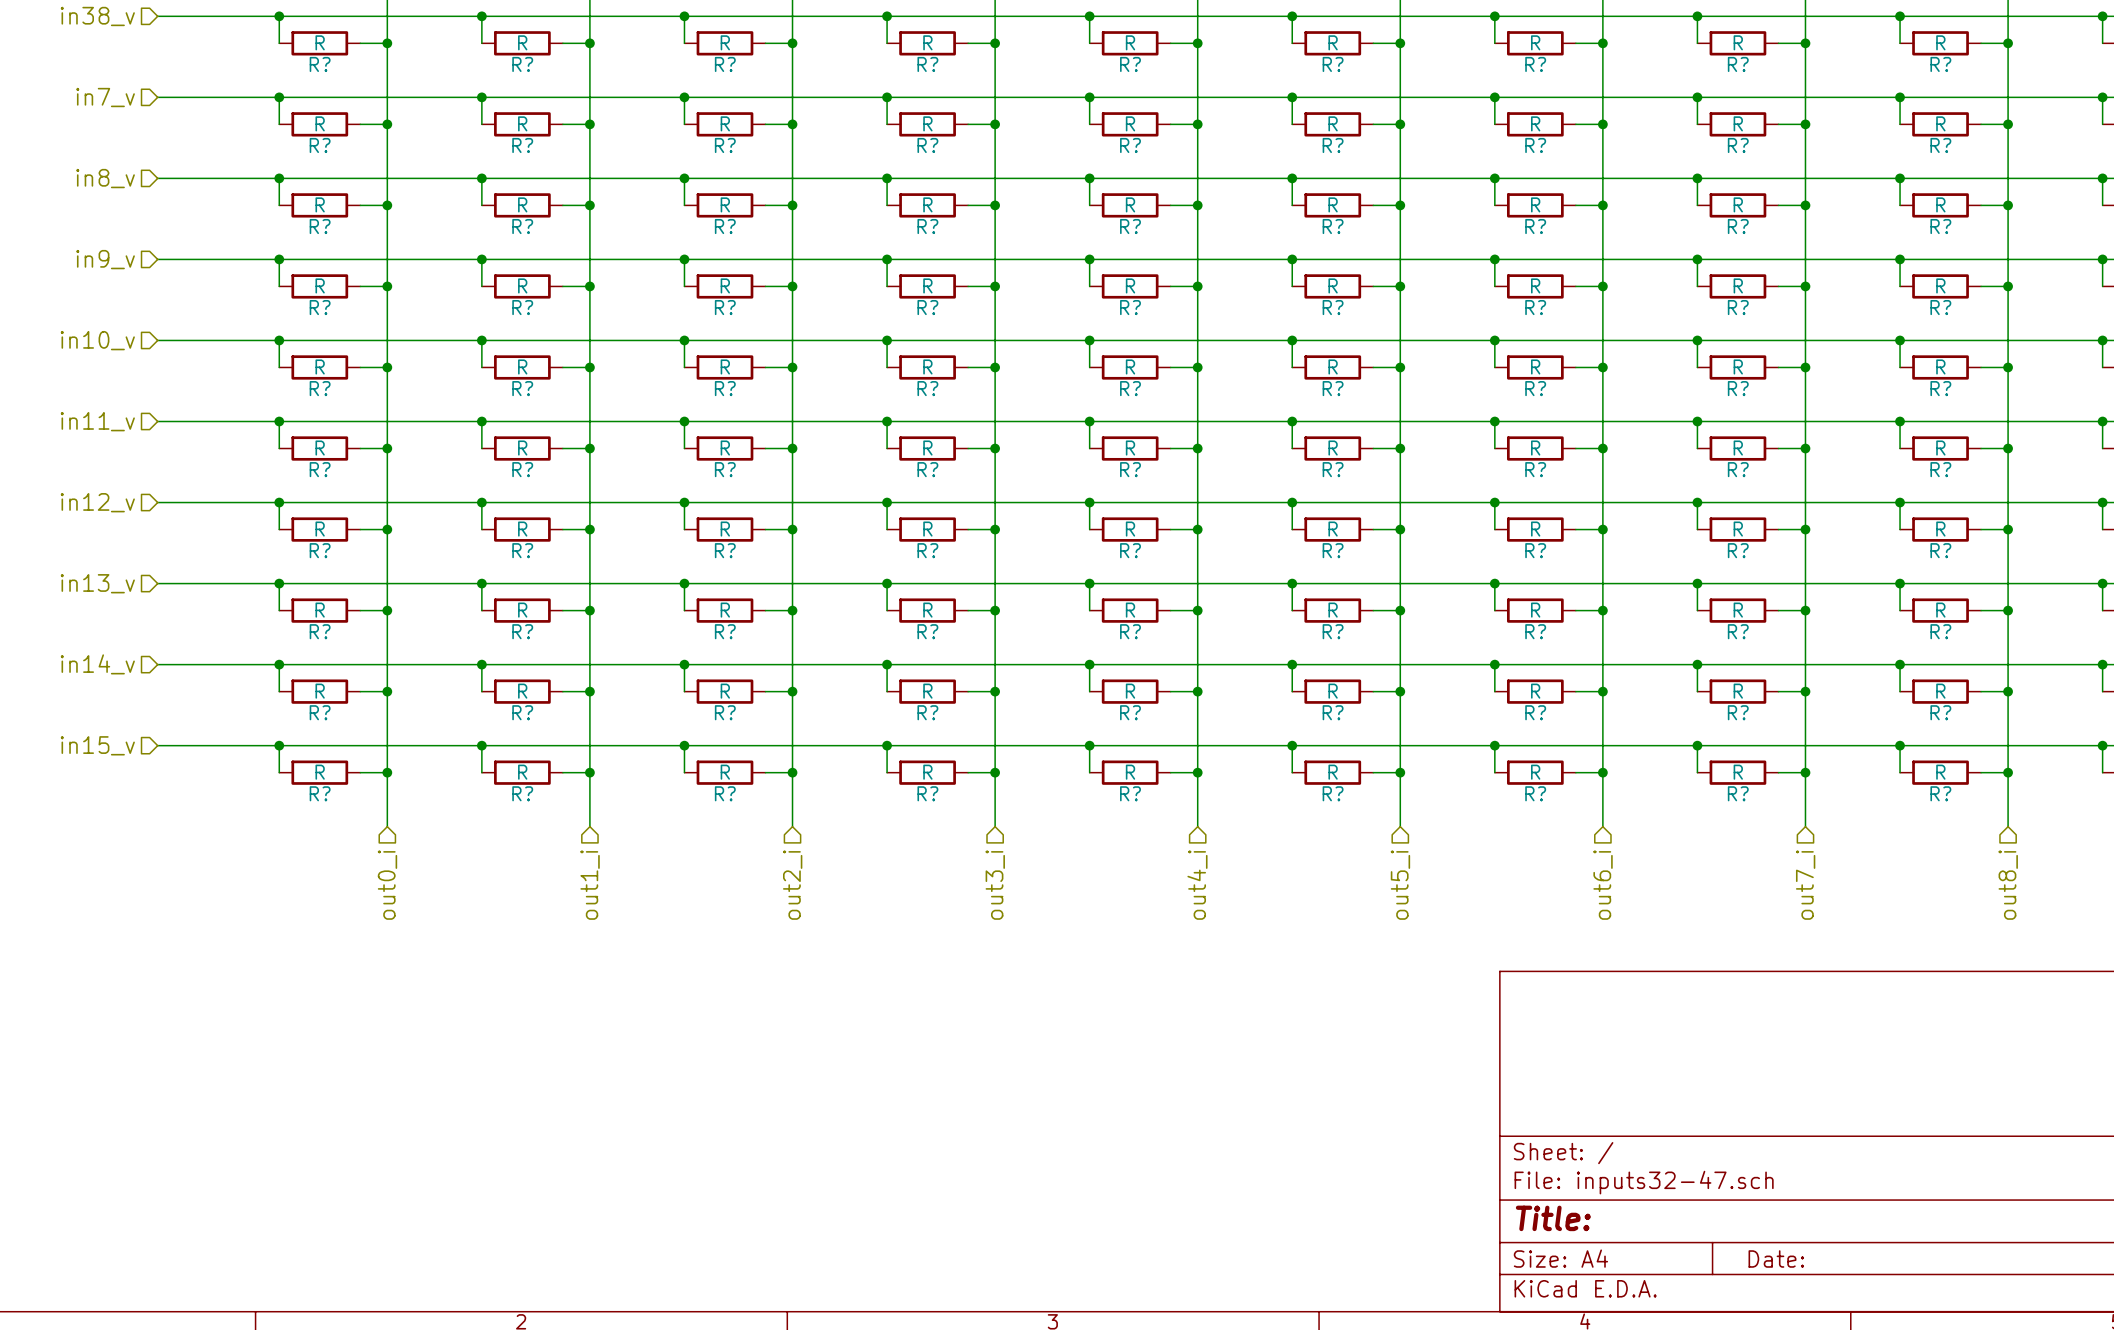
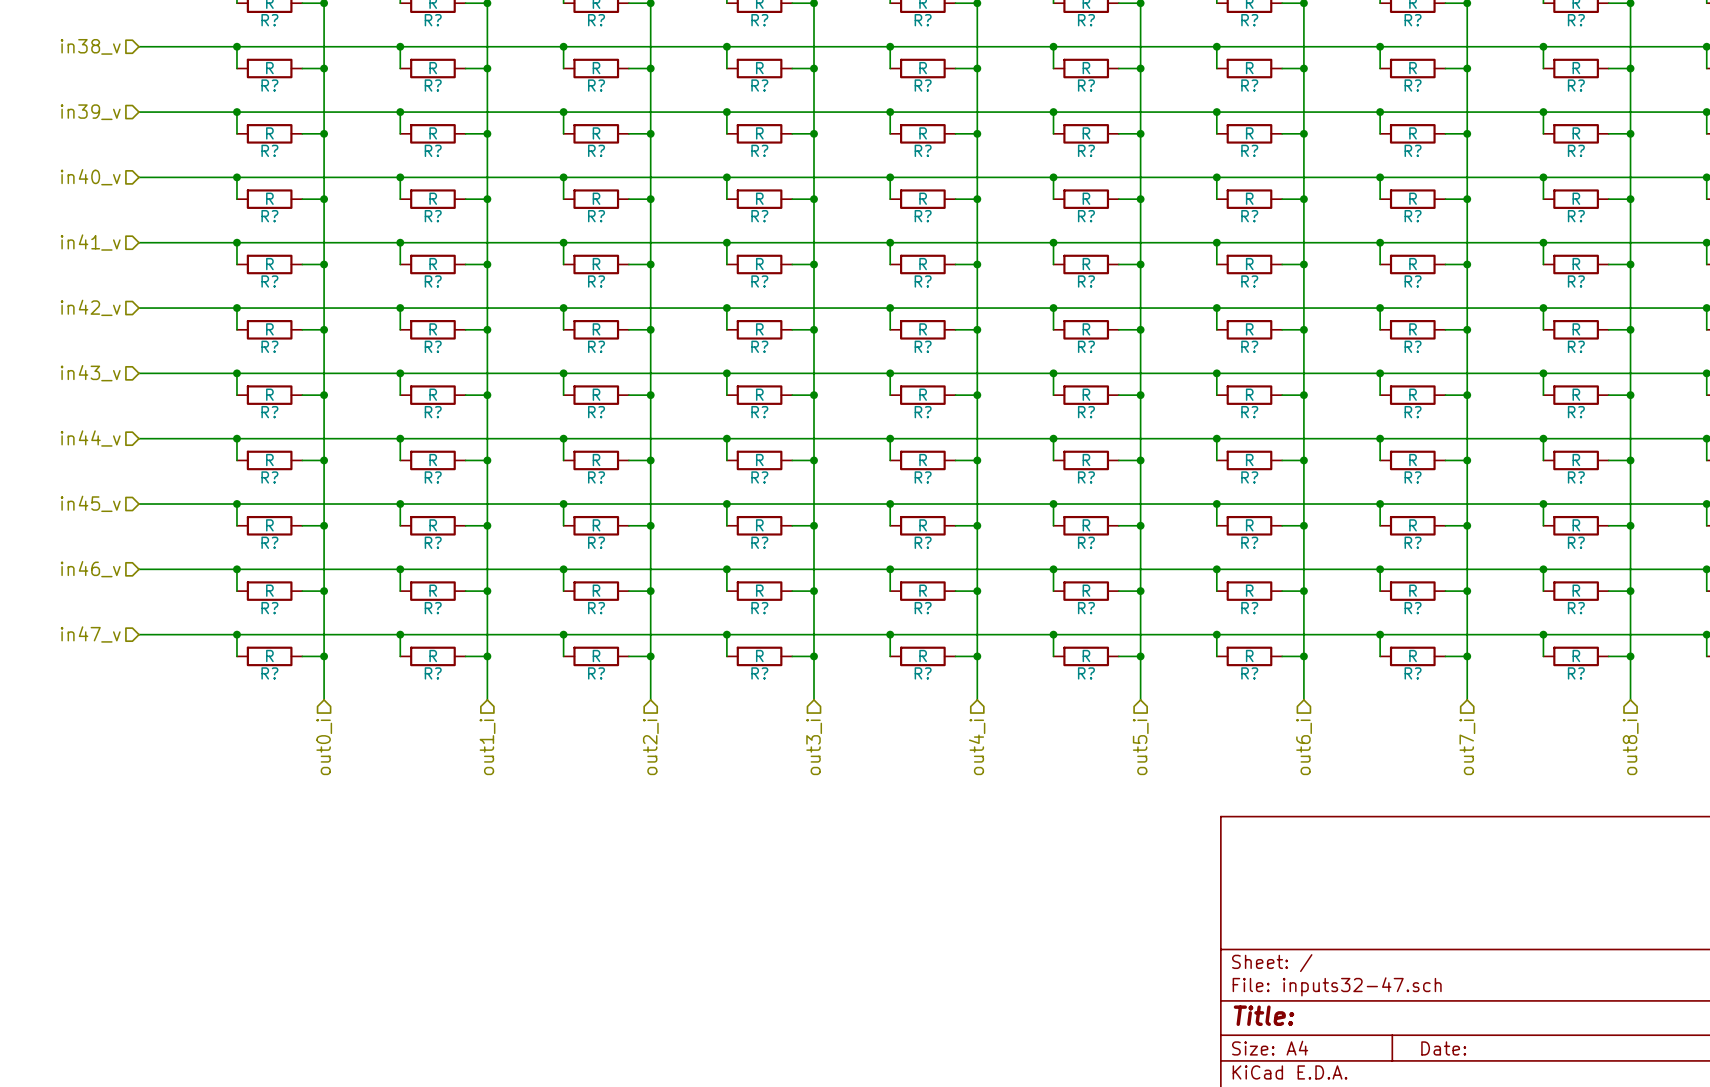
hierarchical label: in7_v (105, 97) -> in39_v (90, 112)
hierarchical label: in8_v (105, 178) -> in40_v (90, 177)
hierarchical label: in9_v (105, 259) -> in41_v (90, 242)
hierarchical label: in10_v (97, 340) -> in42_v (90, 307)
hierarchical label: in11_v (97, 421) -> in43_v (90, 373)
hierarchical label: in12_v (97, 502) -> in44_v (90, 438)
hierarchical label: in13_v (97, 583) -> in45_v (90, 503)
hierarchical label: in14_v (97, 664) -> in46_v (90, 569)
hierarchical label: in15_v (97, 745) -> in47_v (90, 634)

